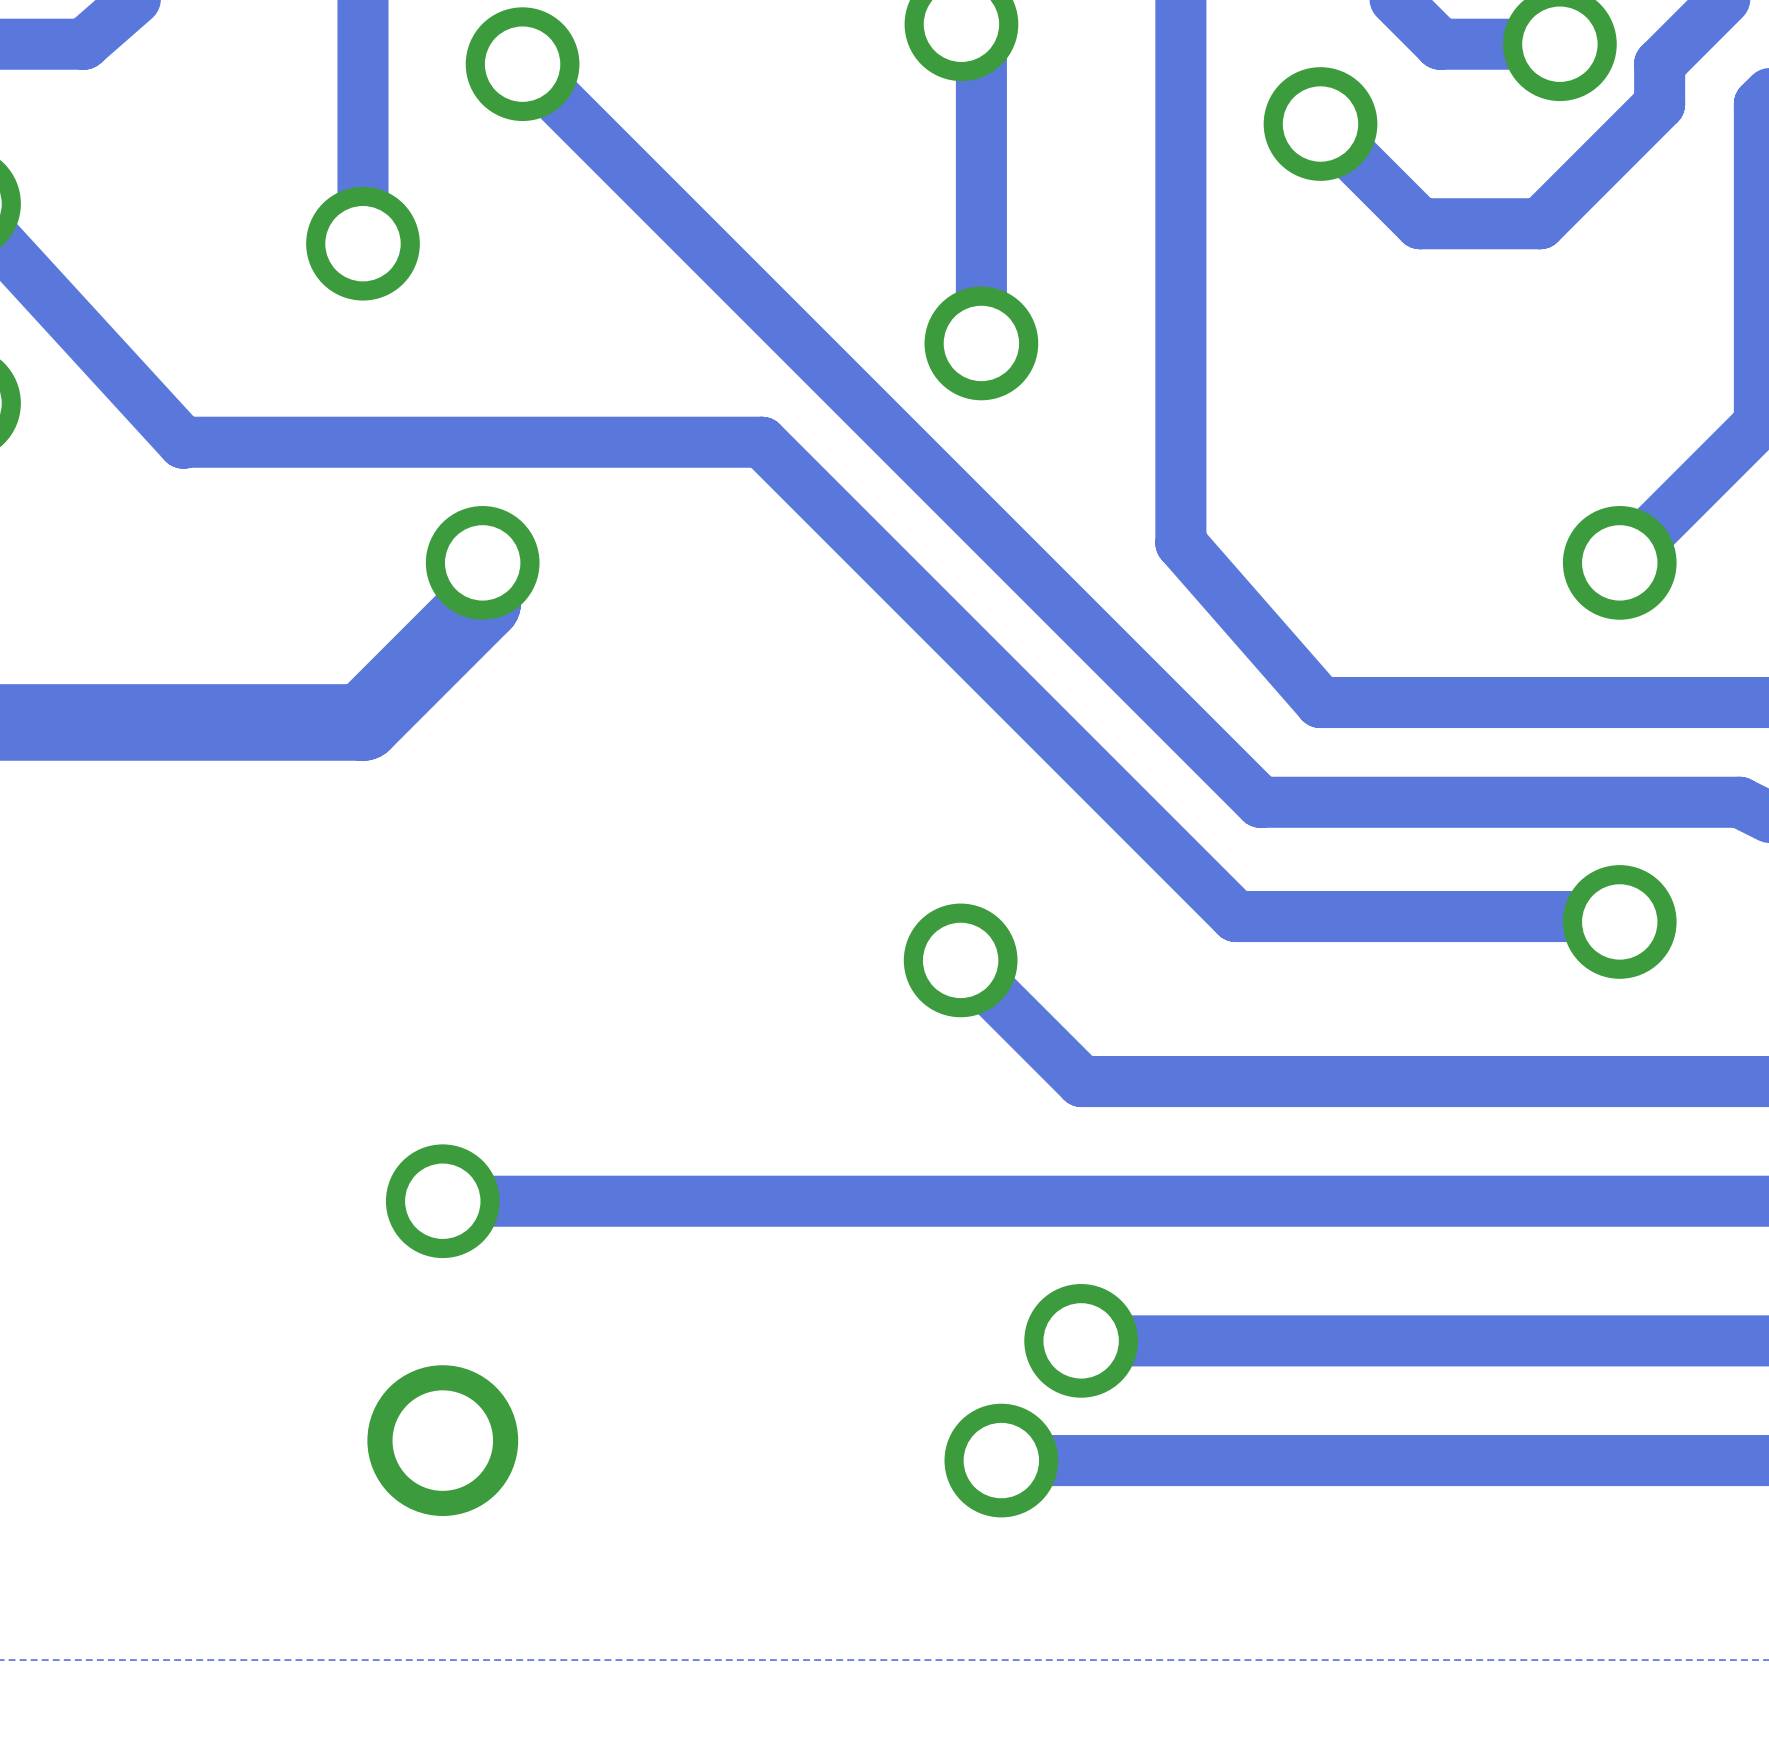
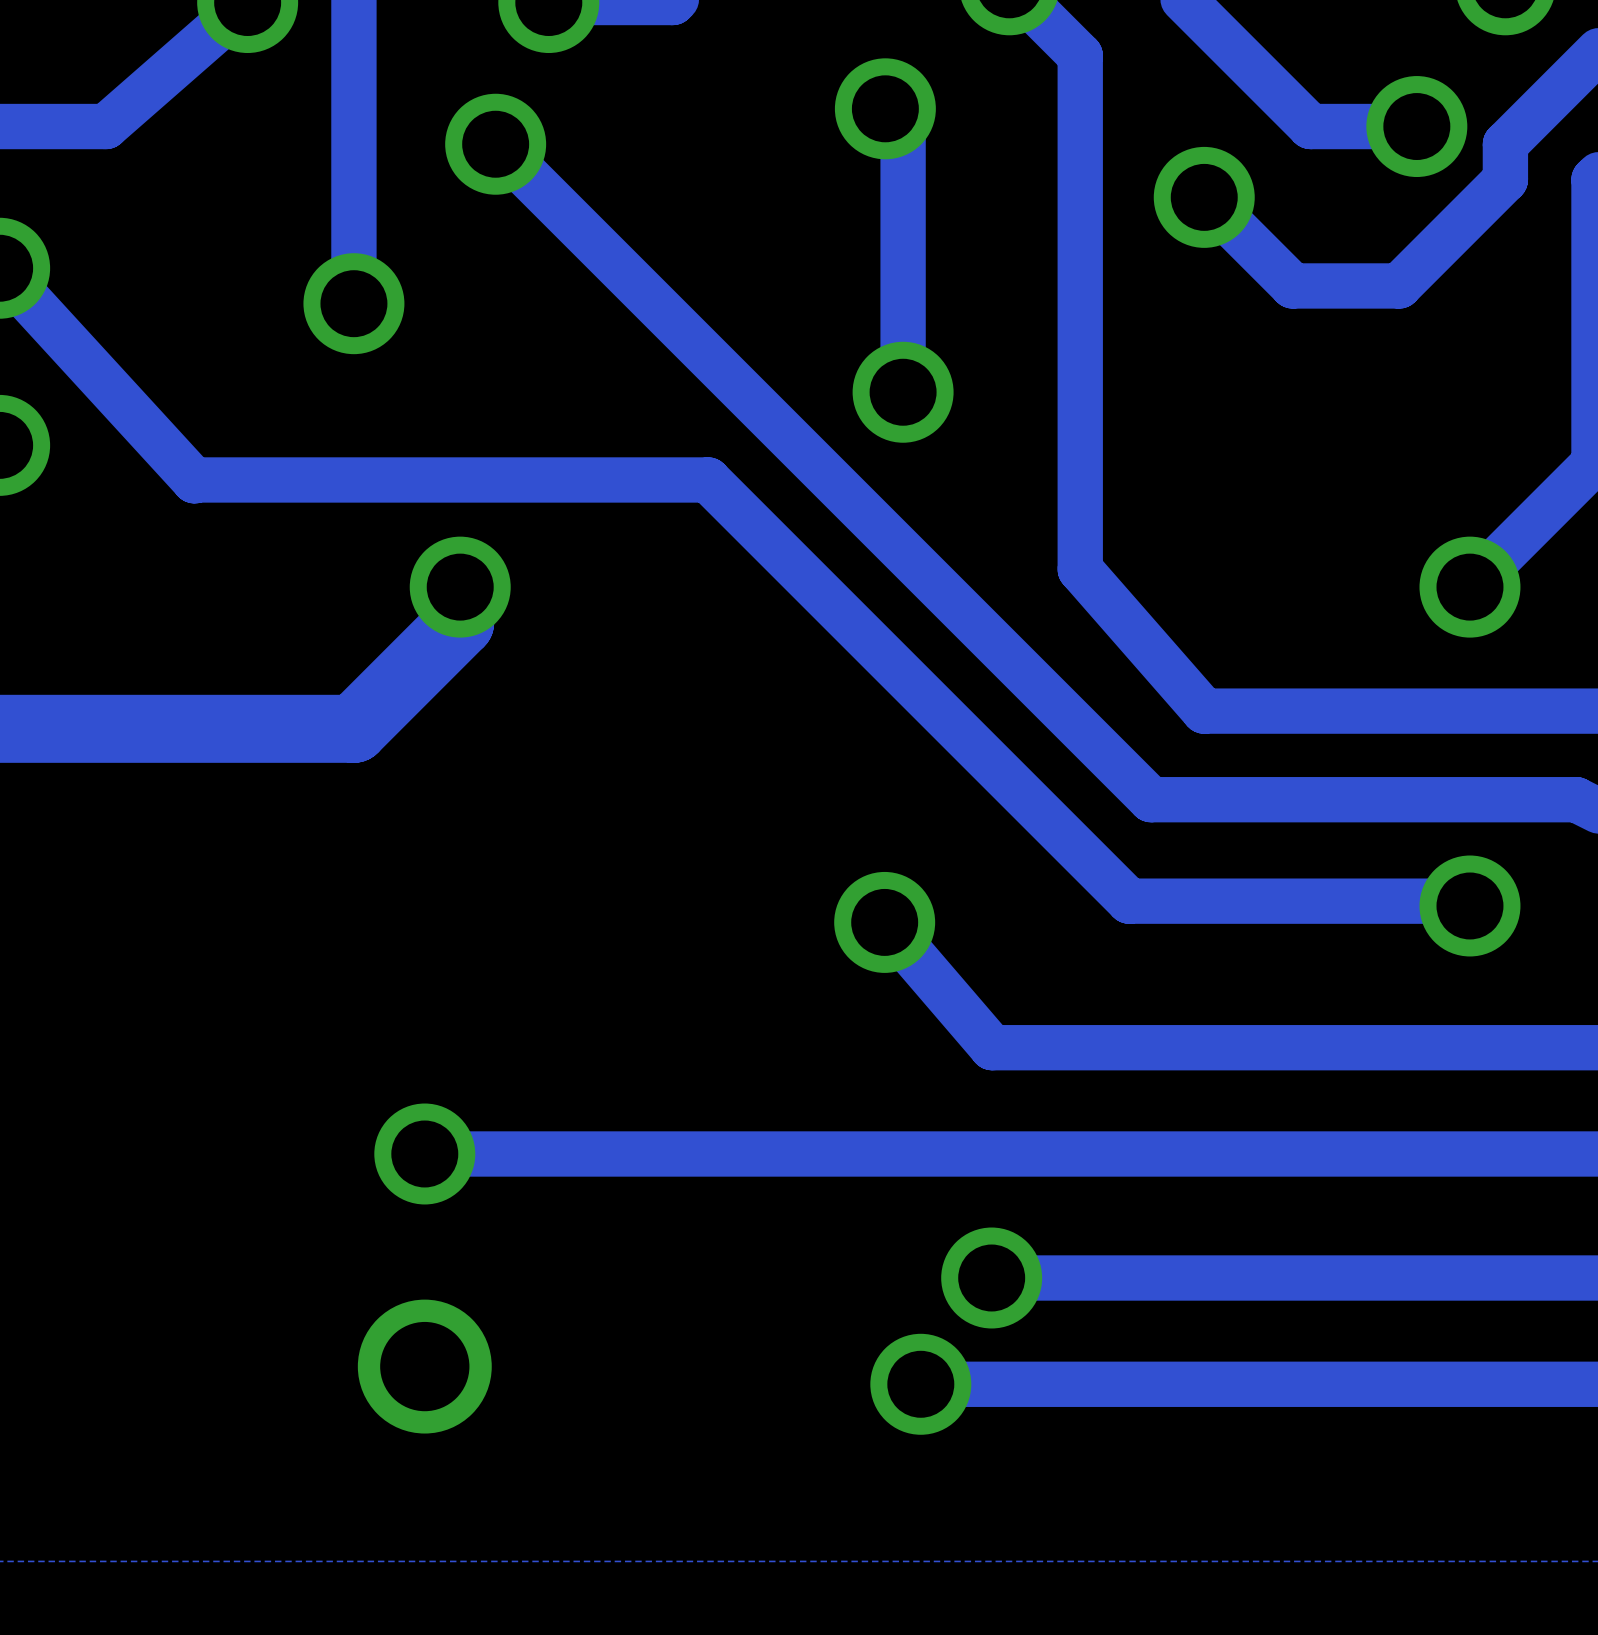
track: (960, 960) (1081, 1081) -> (884, 922) (992, 1047)
via position: (960, 960) -> (884, 922)

